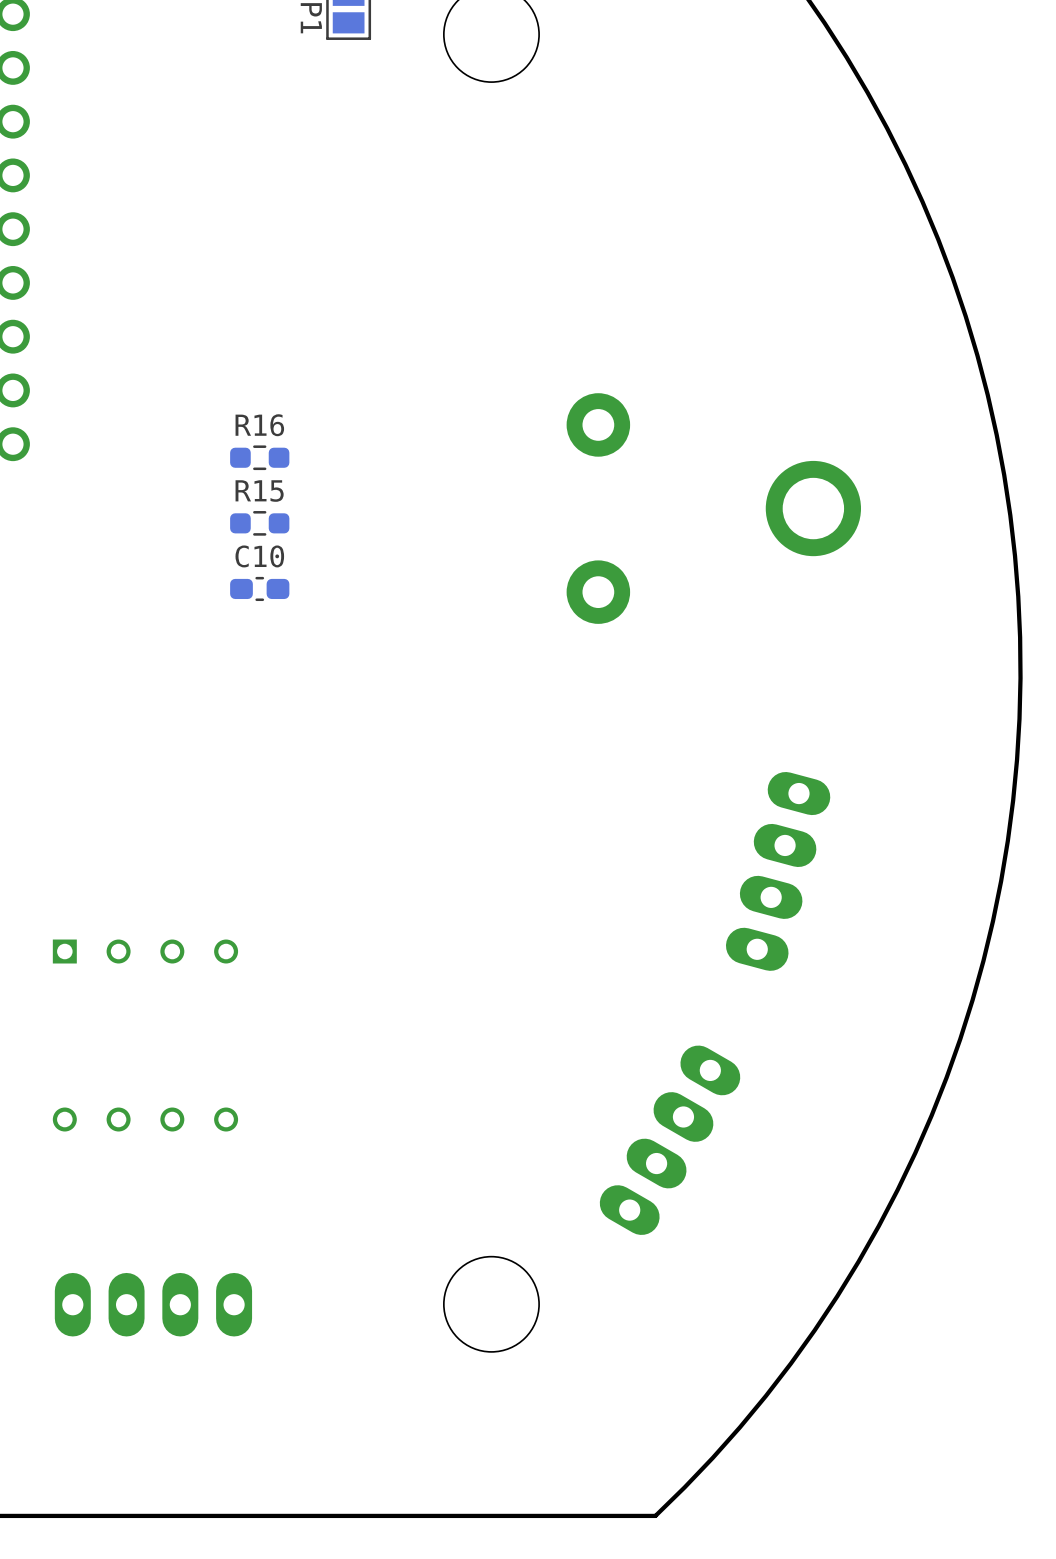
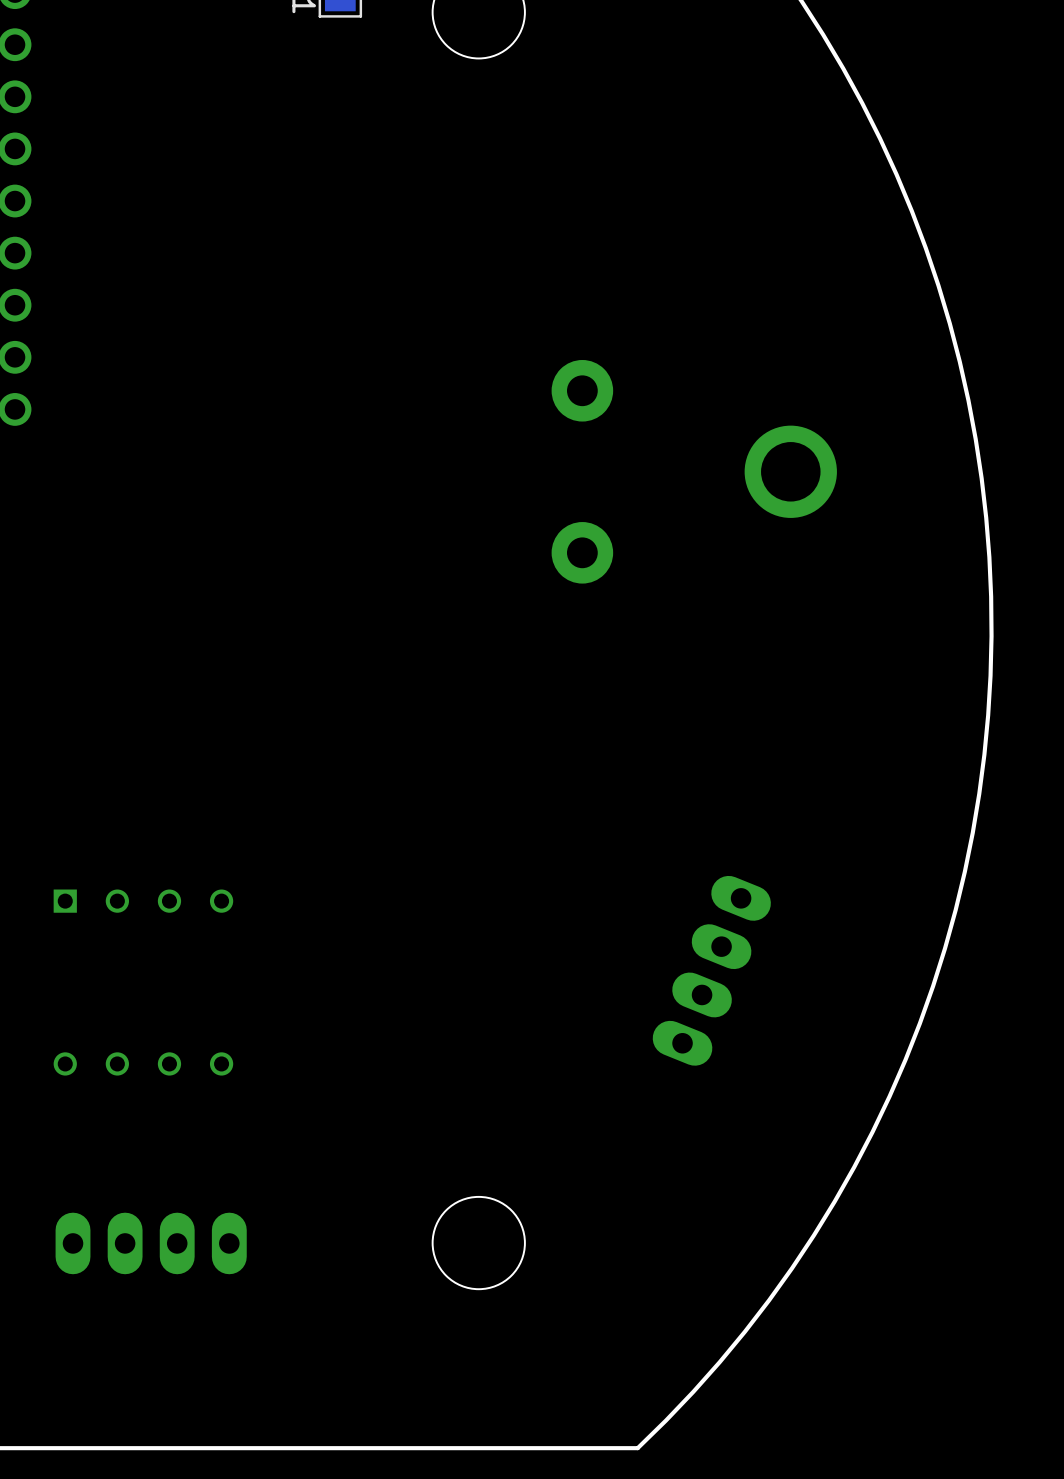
R16: (259, 457) -> none
R15: (259, 523) -> none
C10: (259, 588) -> none
part: (778, 871) -> none
part: none -> (711, 970)
part: (670, 1140) -> none

